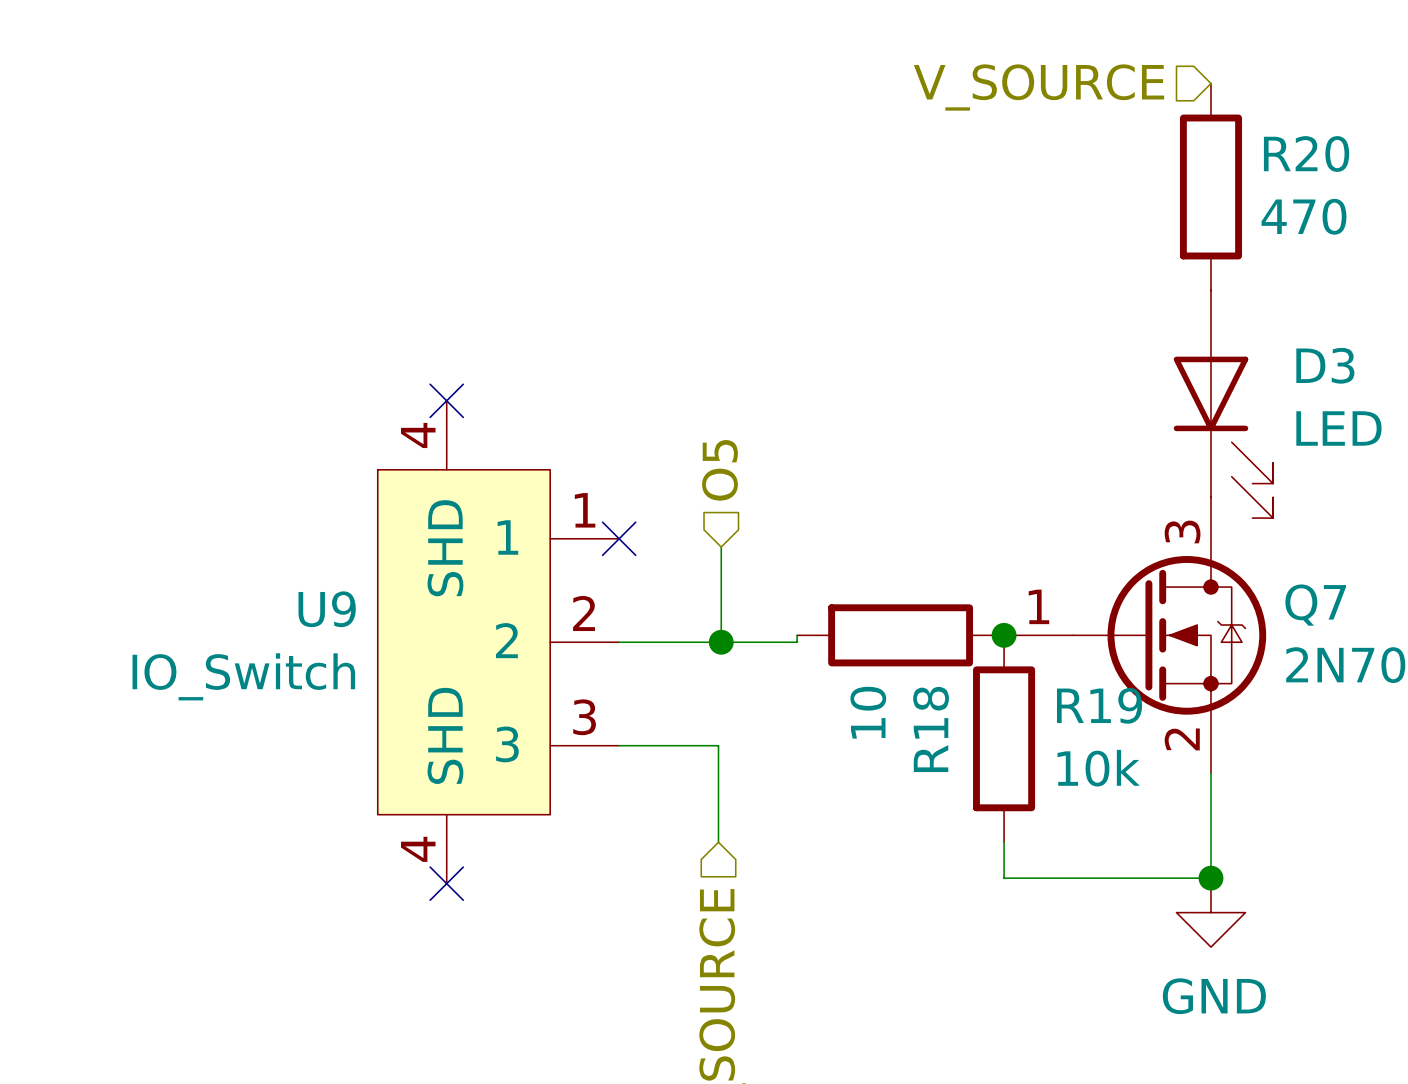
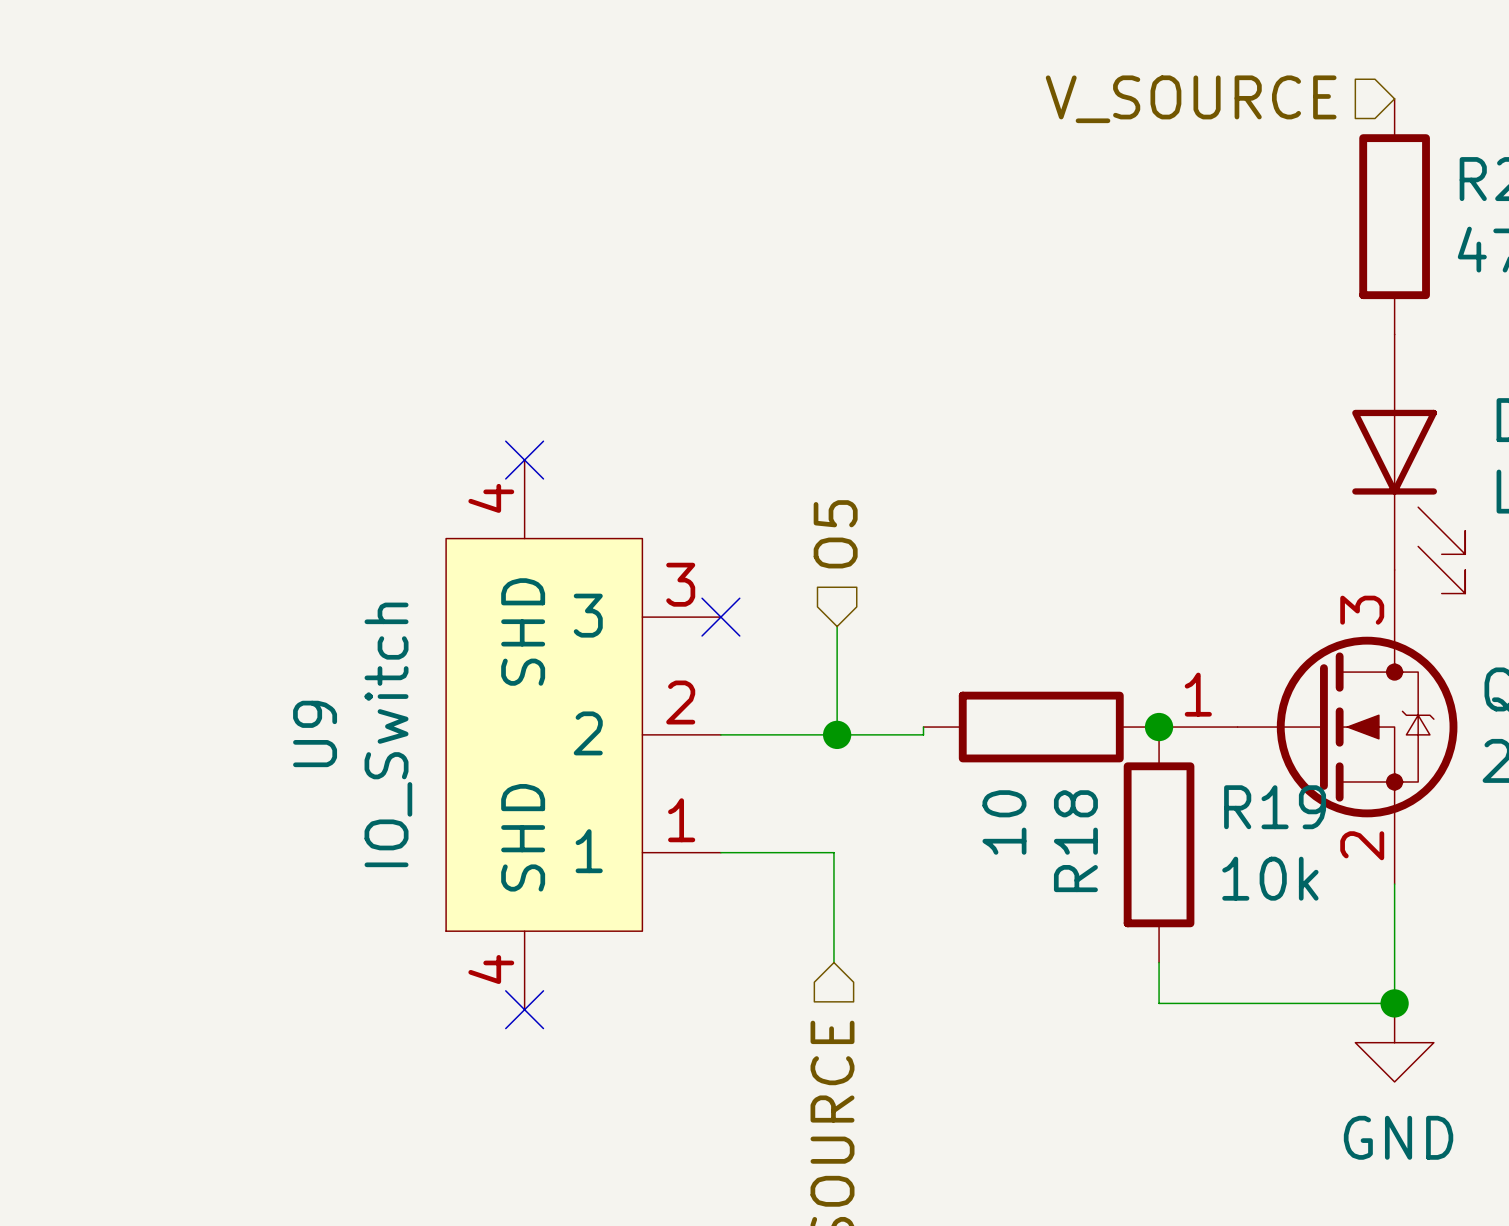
U9 name position: U9 (327, 609) -> U9 (315, 733)
U9 flip: as is (463, 642) -> up-down (544, 734)
U9 value position: IO_Switch (243, 676) -> IO_Switch (388, 734)

